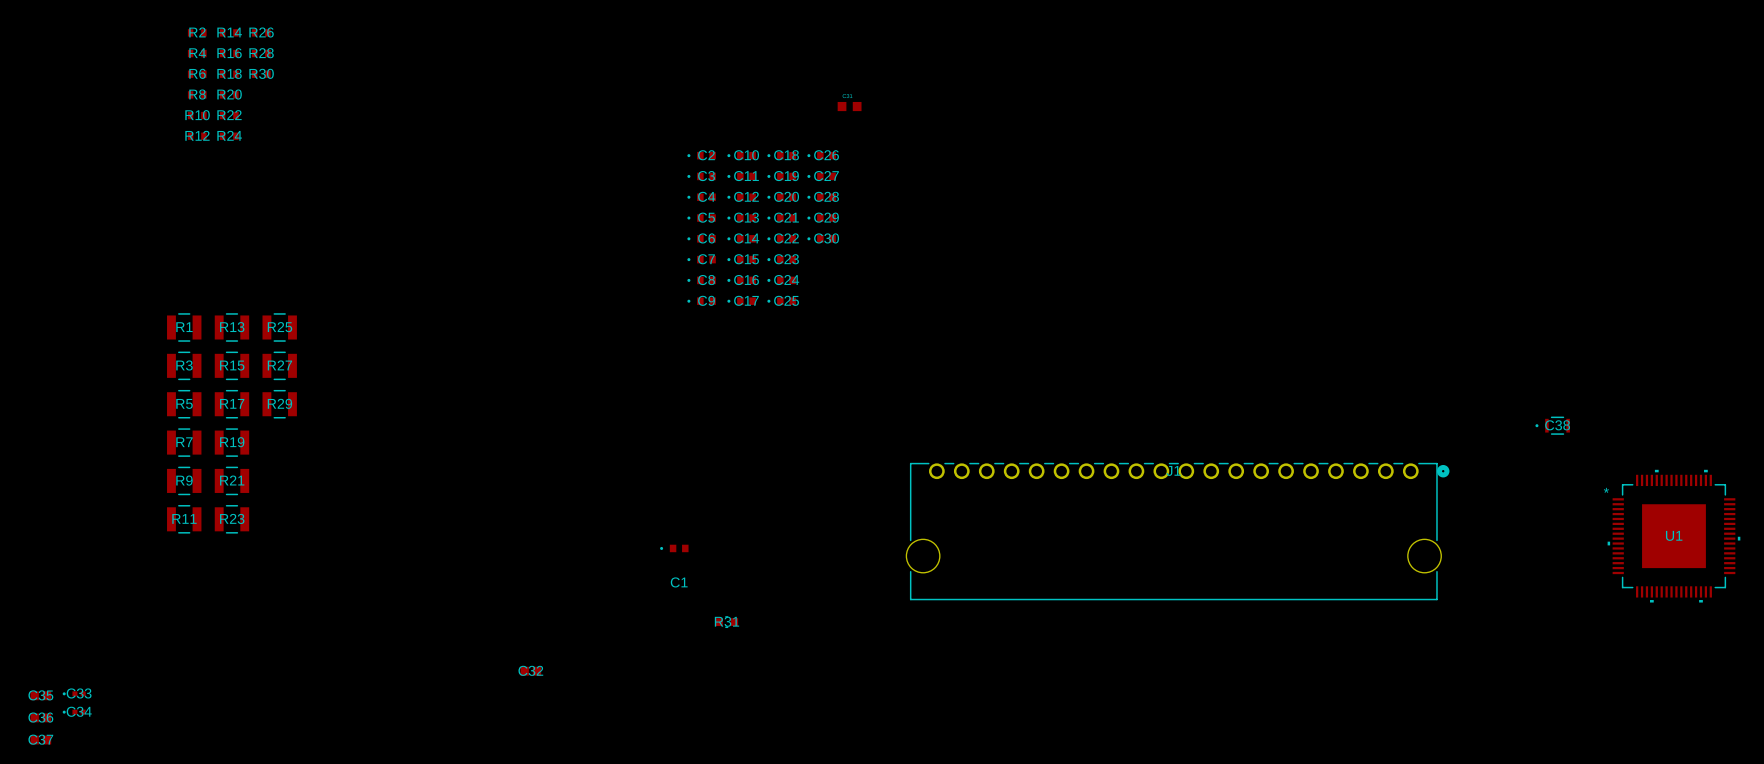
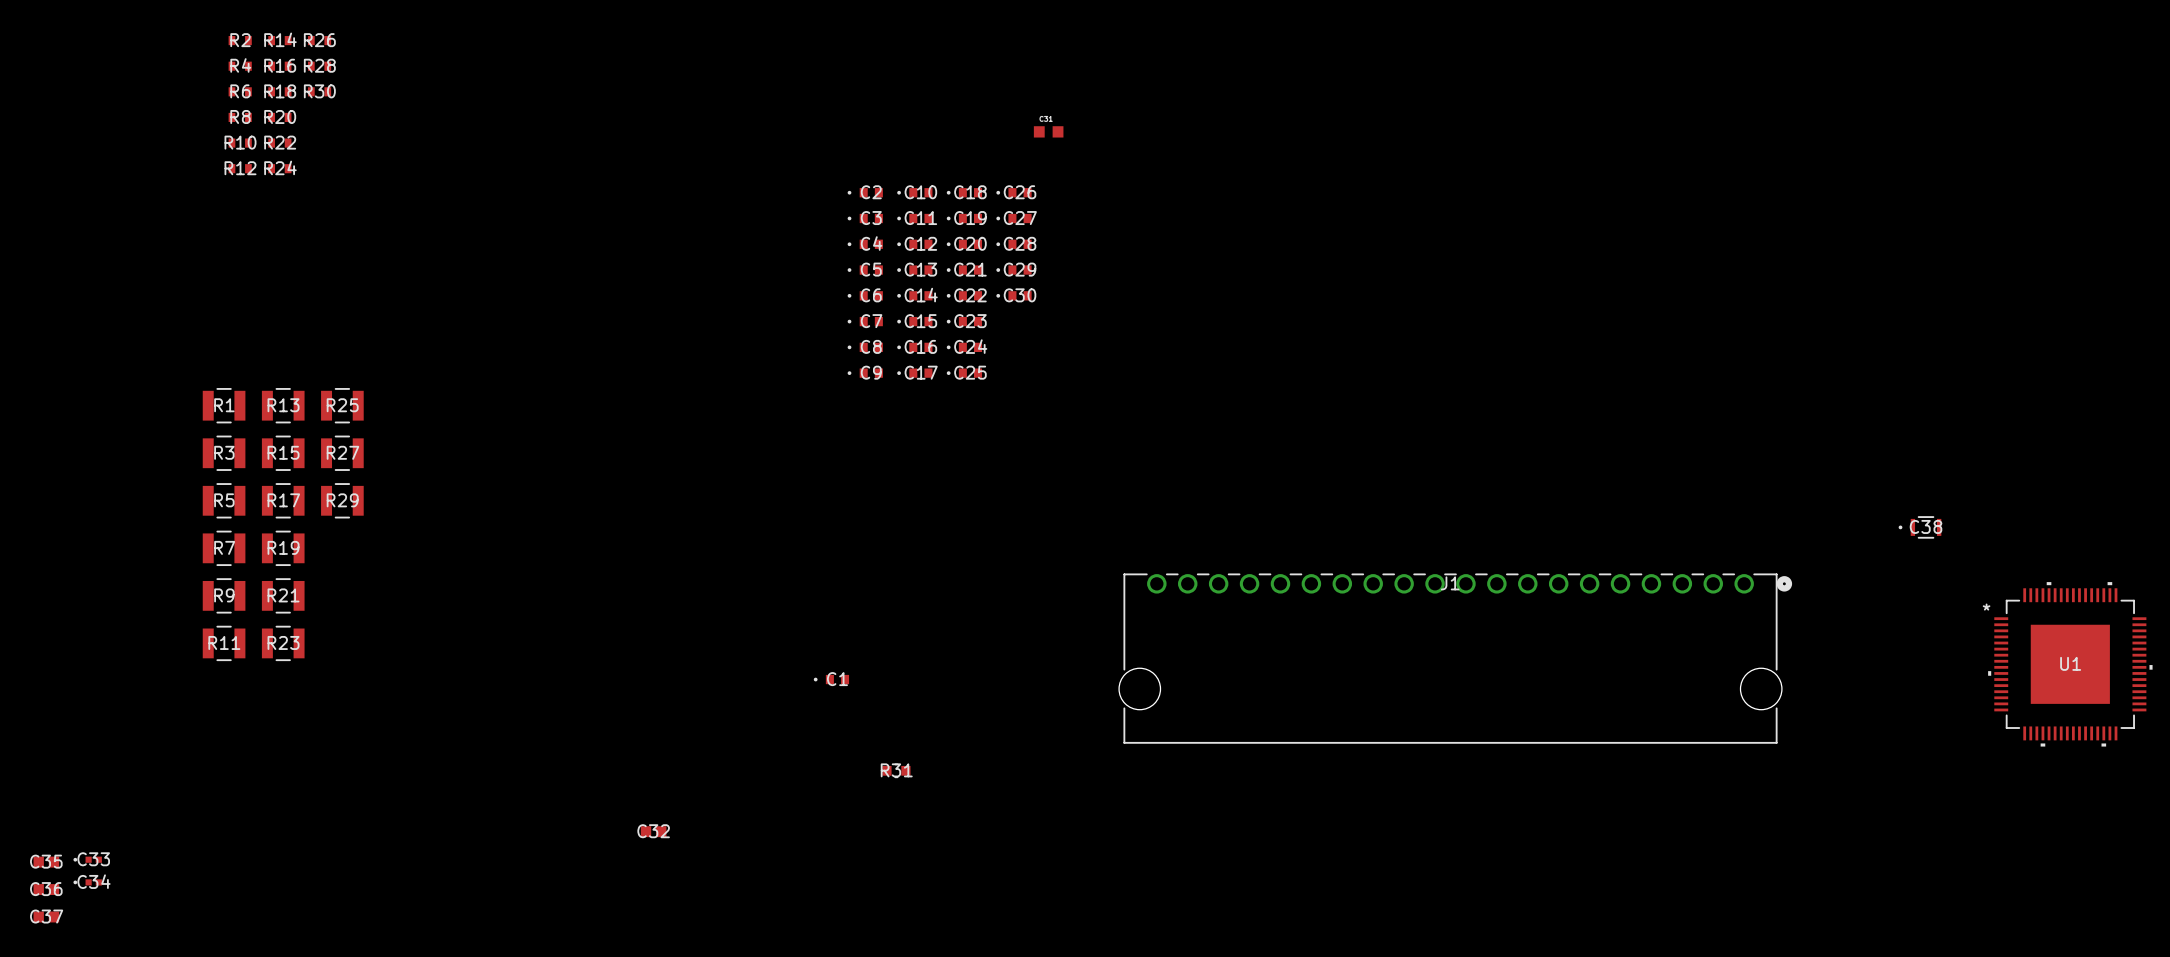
C1 name position: C1 (679, 582) -> C1 (837, 679)

